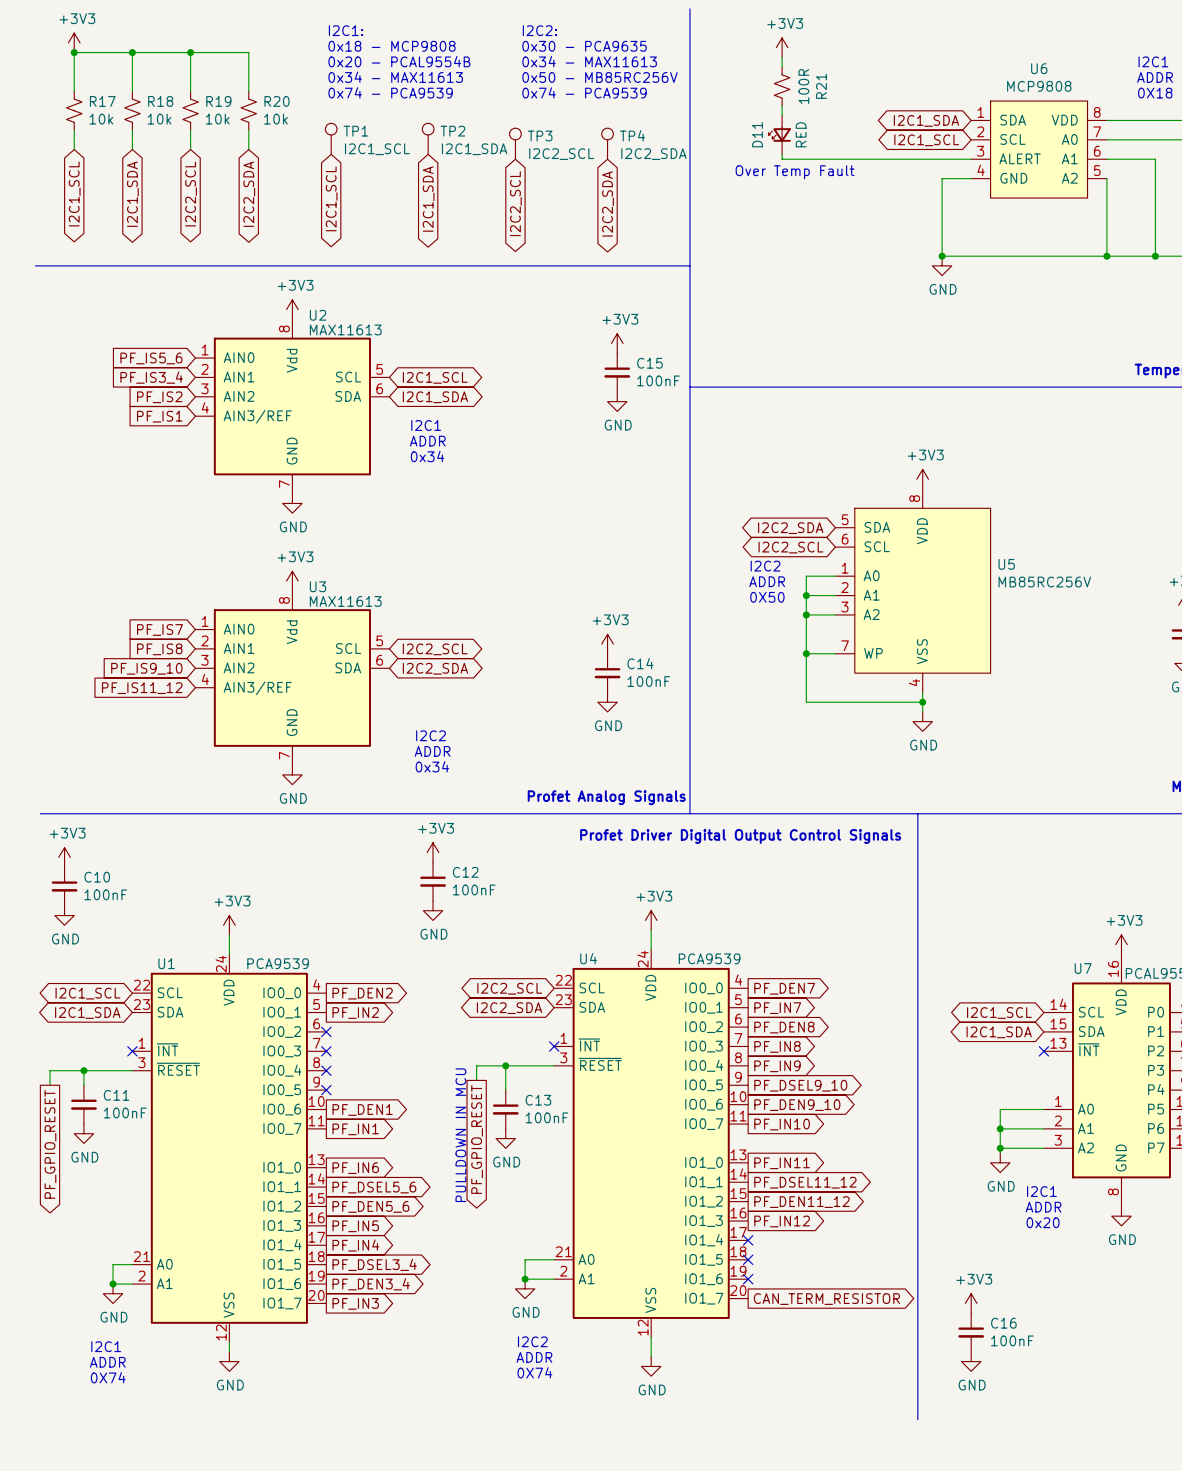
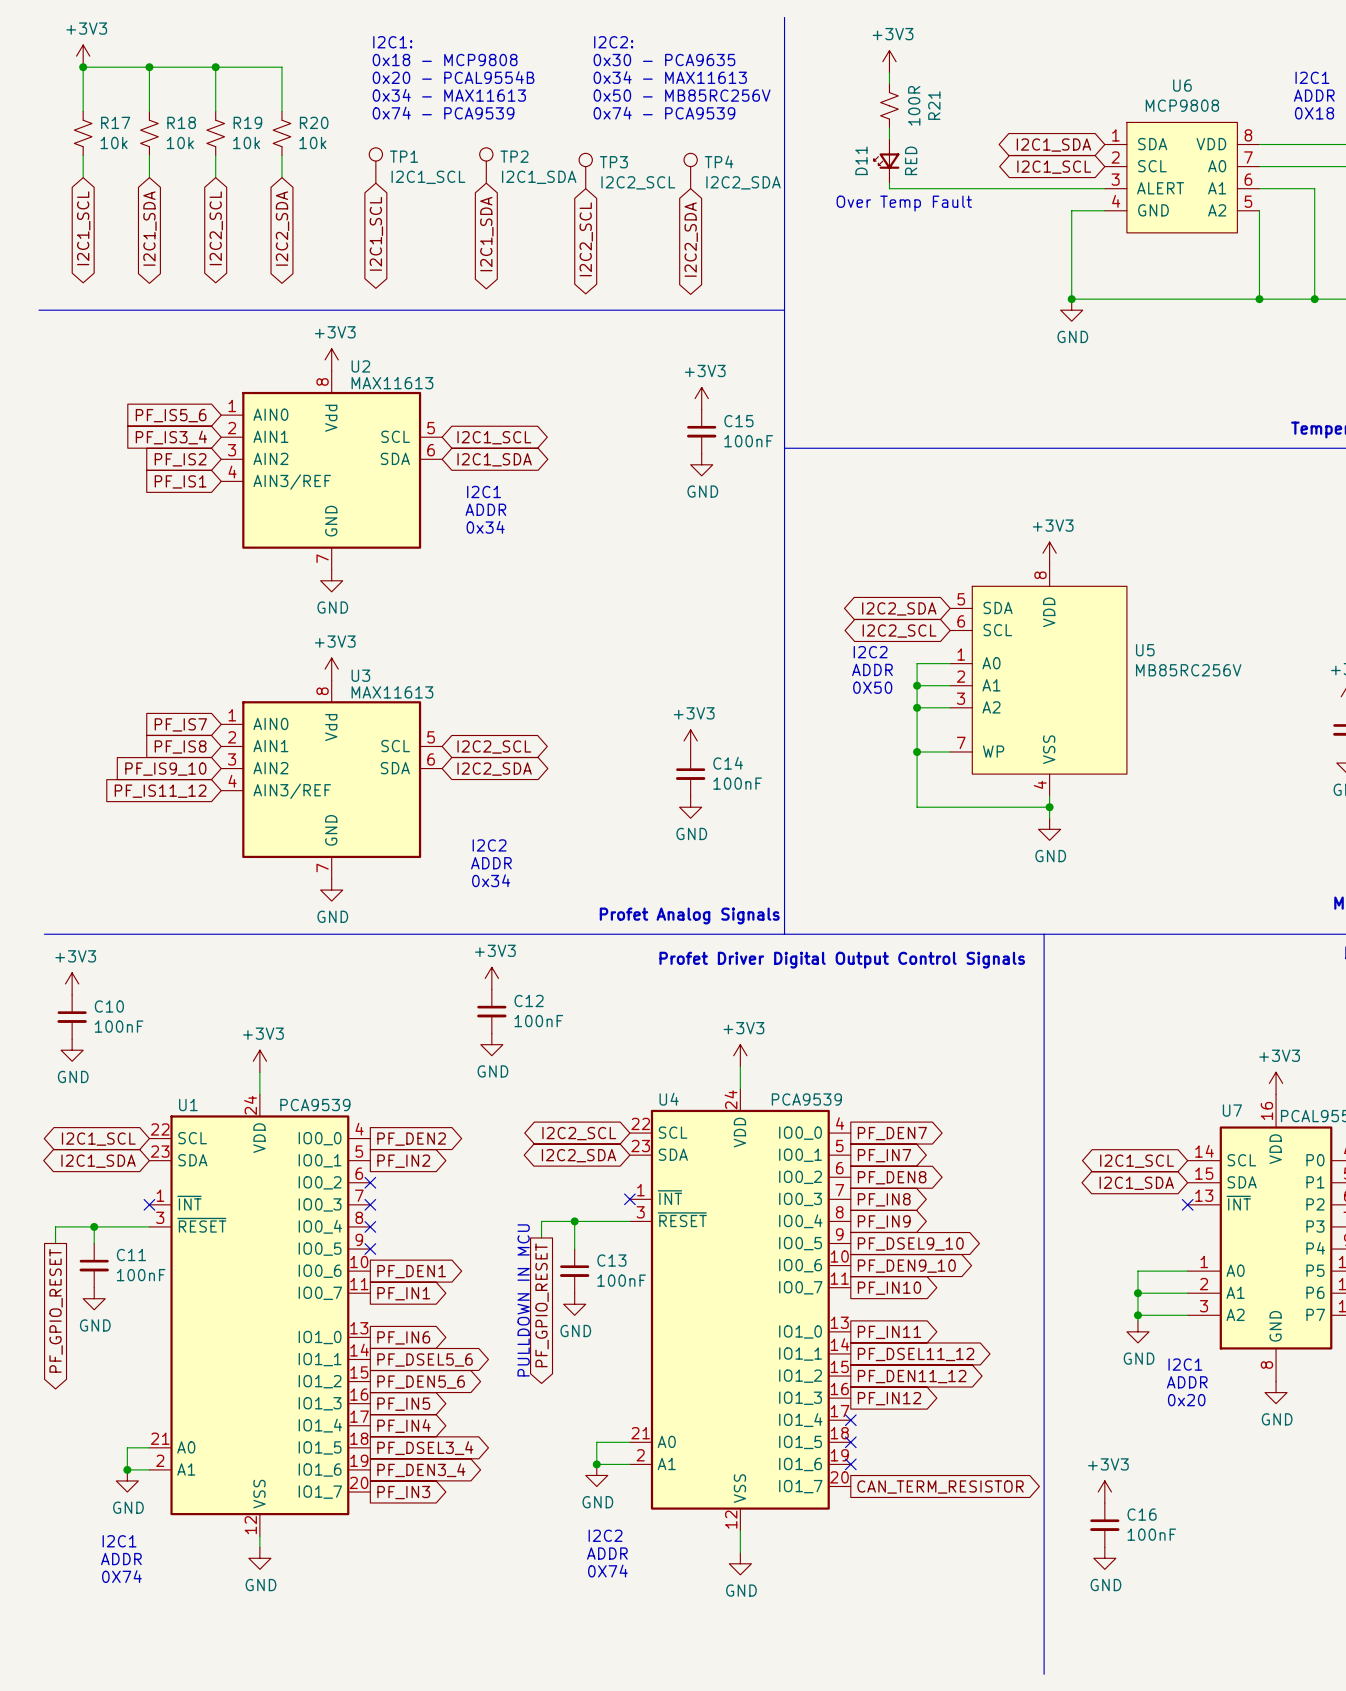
line: none -> (1044, 1624) (1044, 1674)

